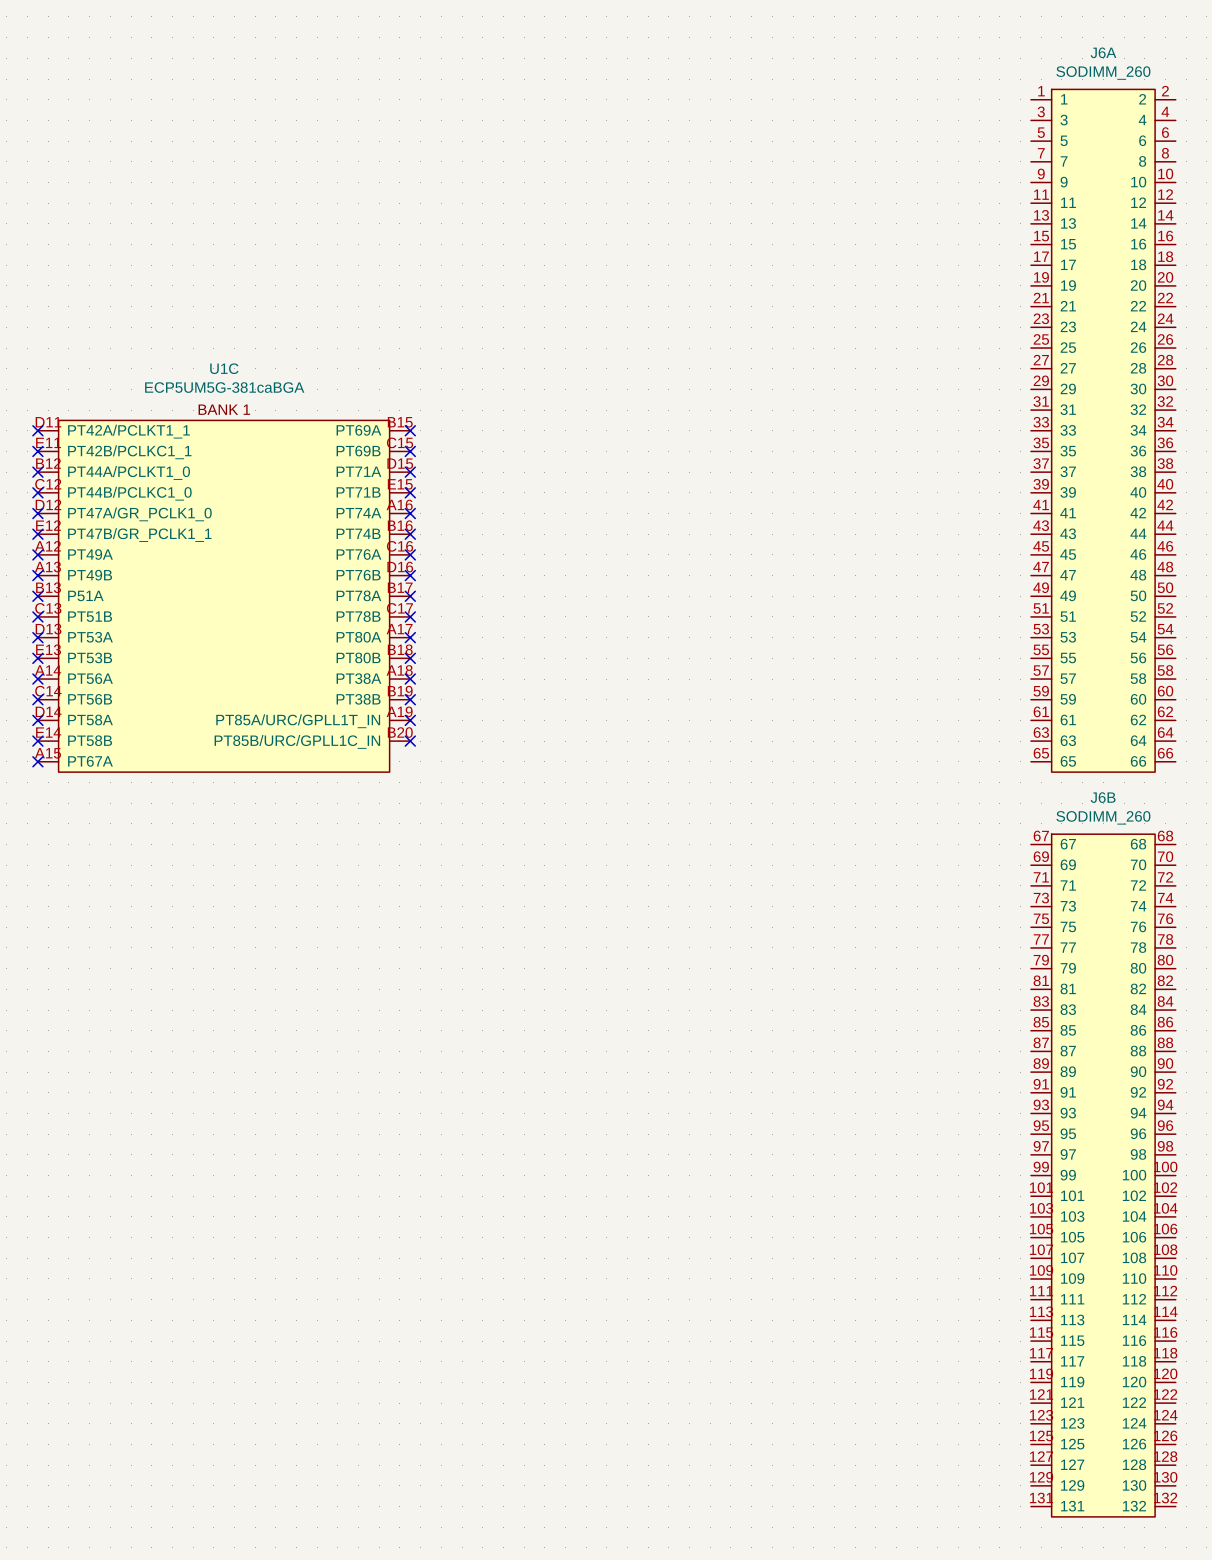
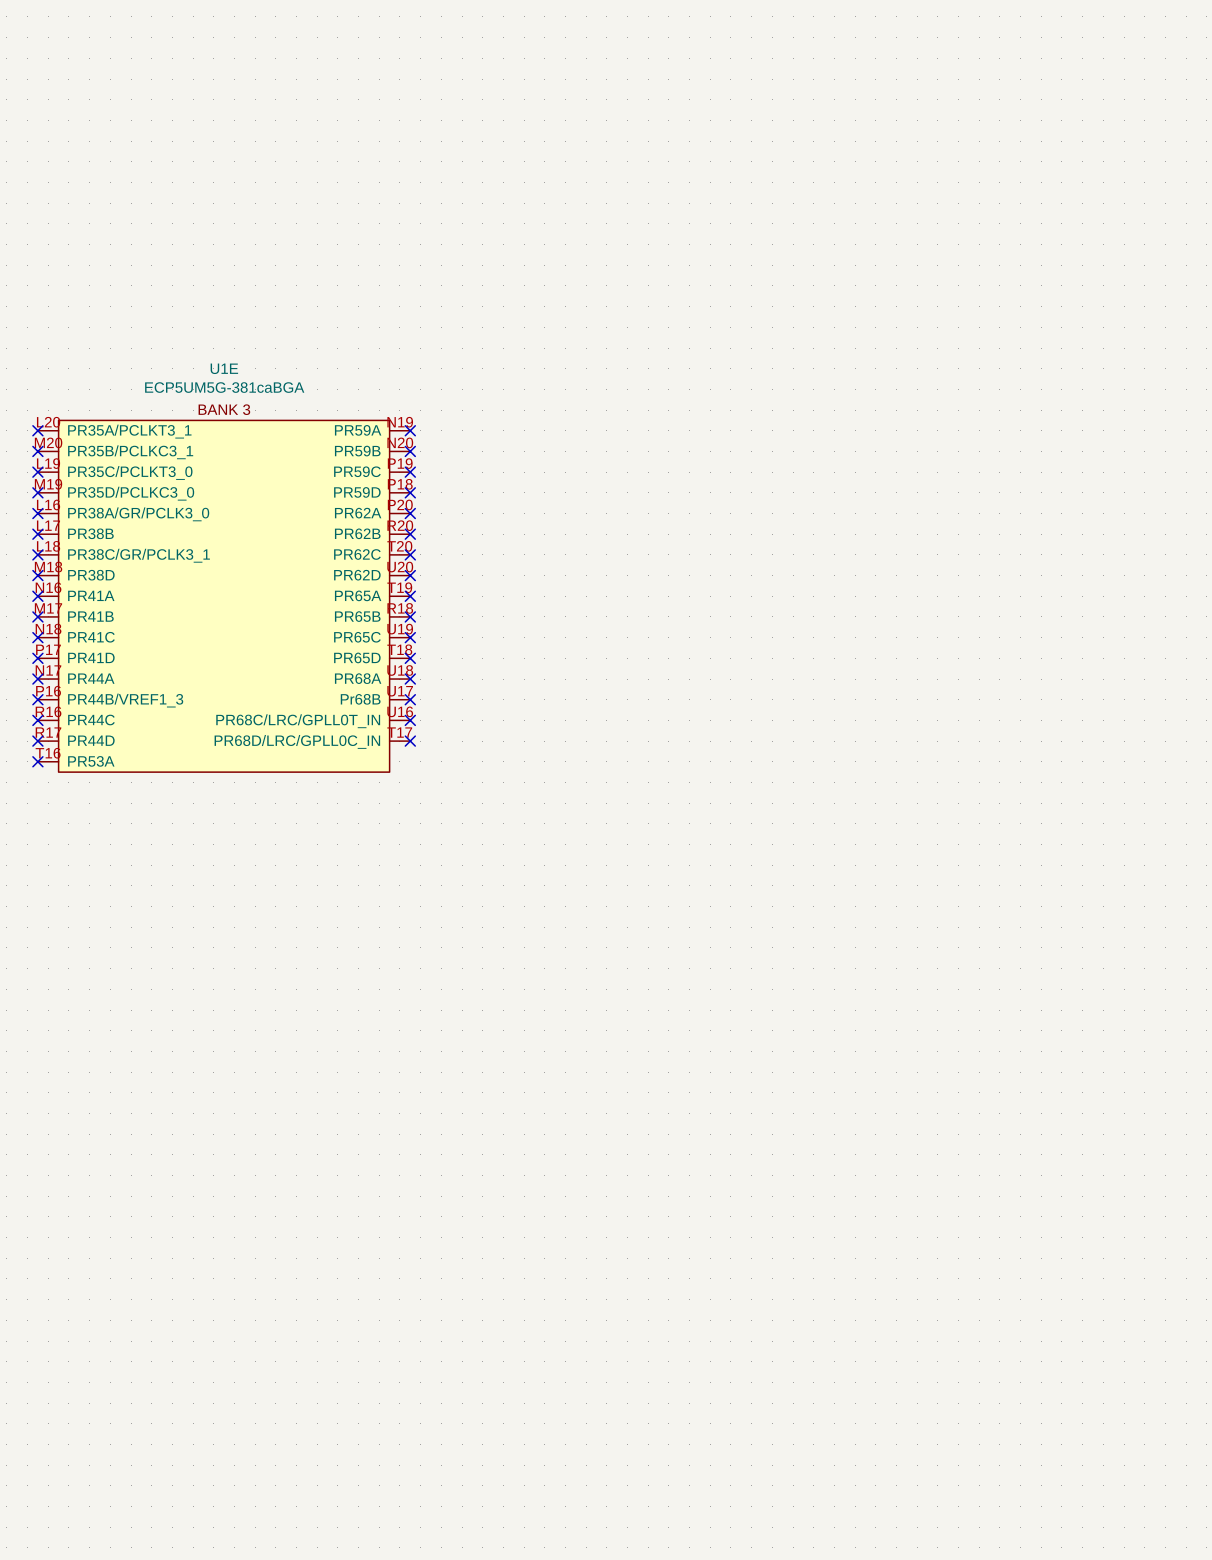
U1C name: U1C (224, 368) -> U1E (224, 368)
U1C symbol: [37, 420, 411, 773] -> [37, 420, 411, 773]
J6A: SODIMM_260 (1103, 430) -> none
J6B: SODIMM_260 (1103, 1175) -> none

